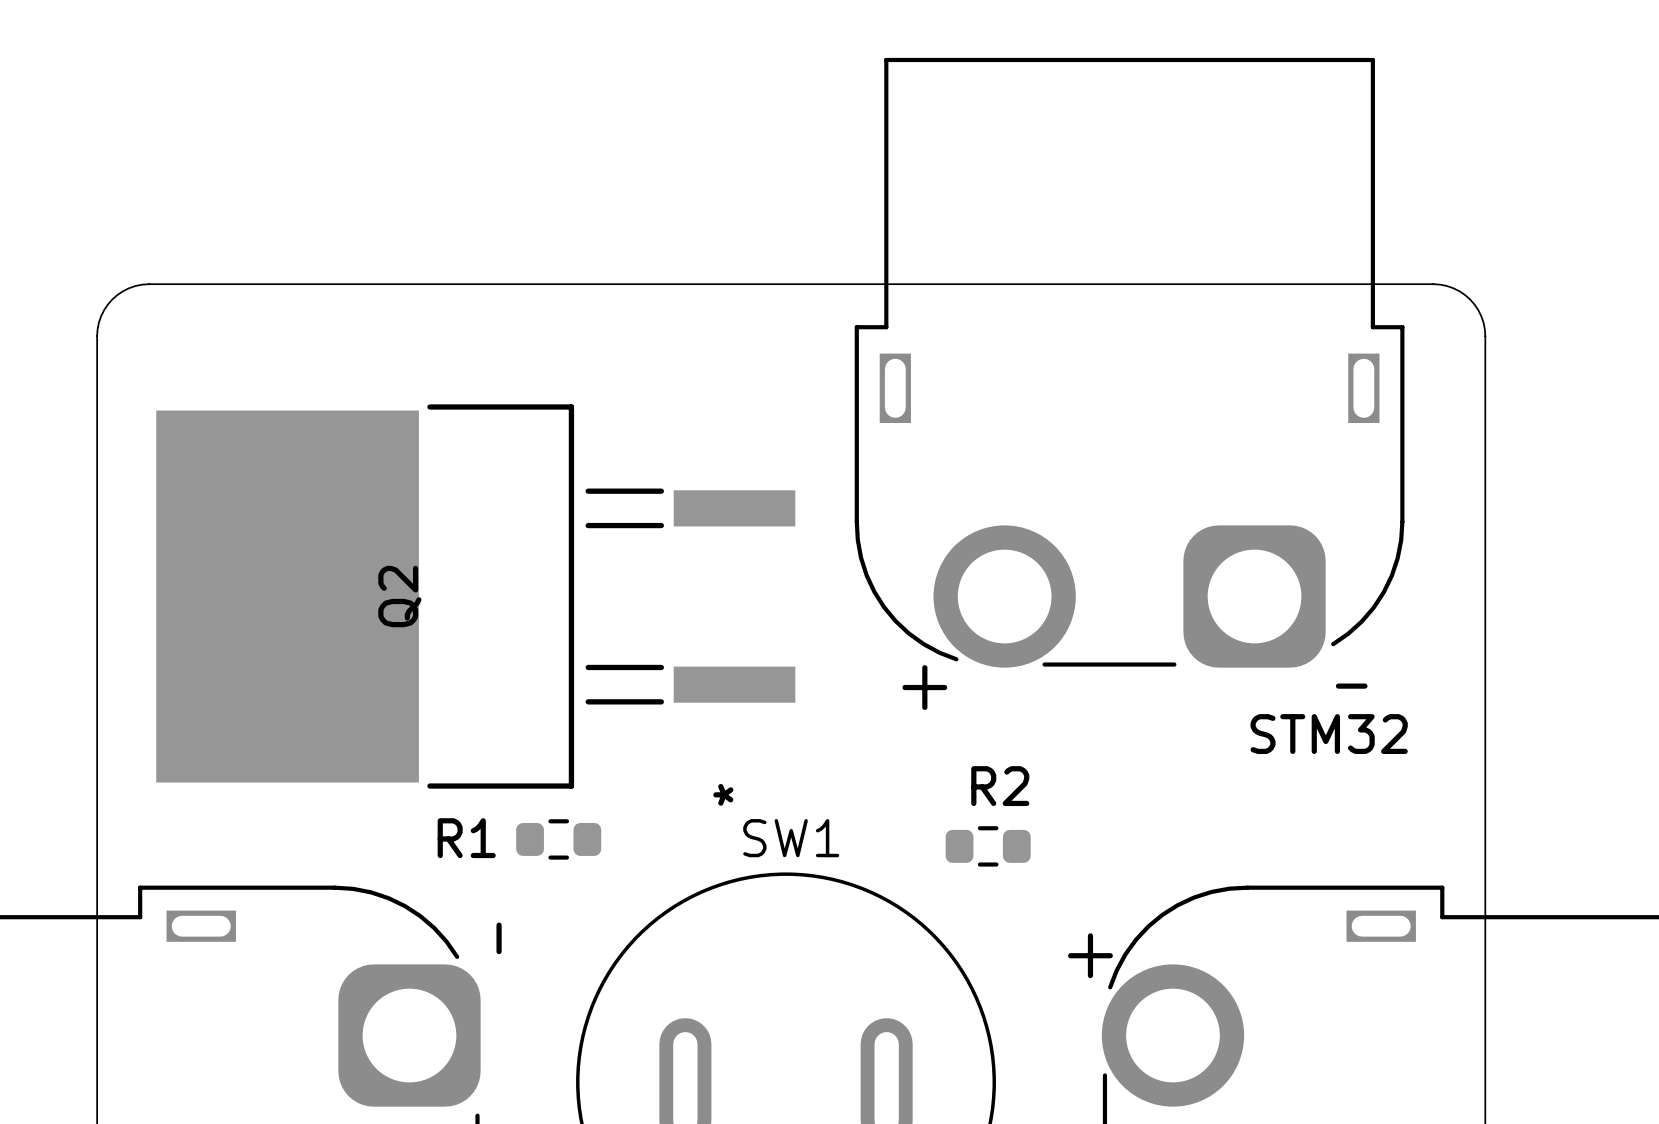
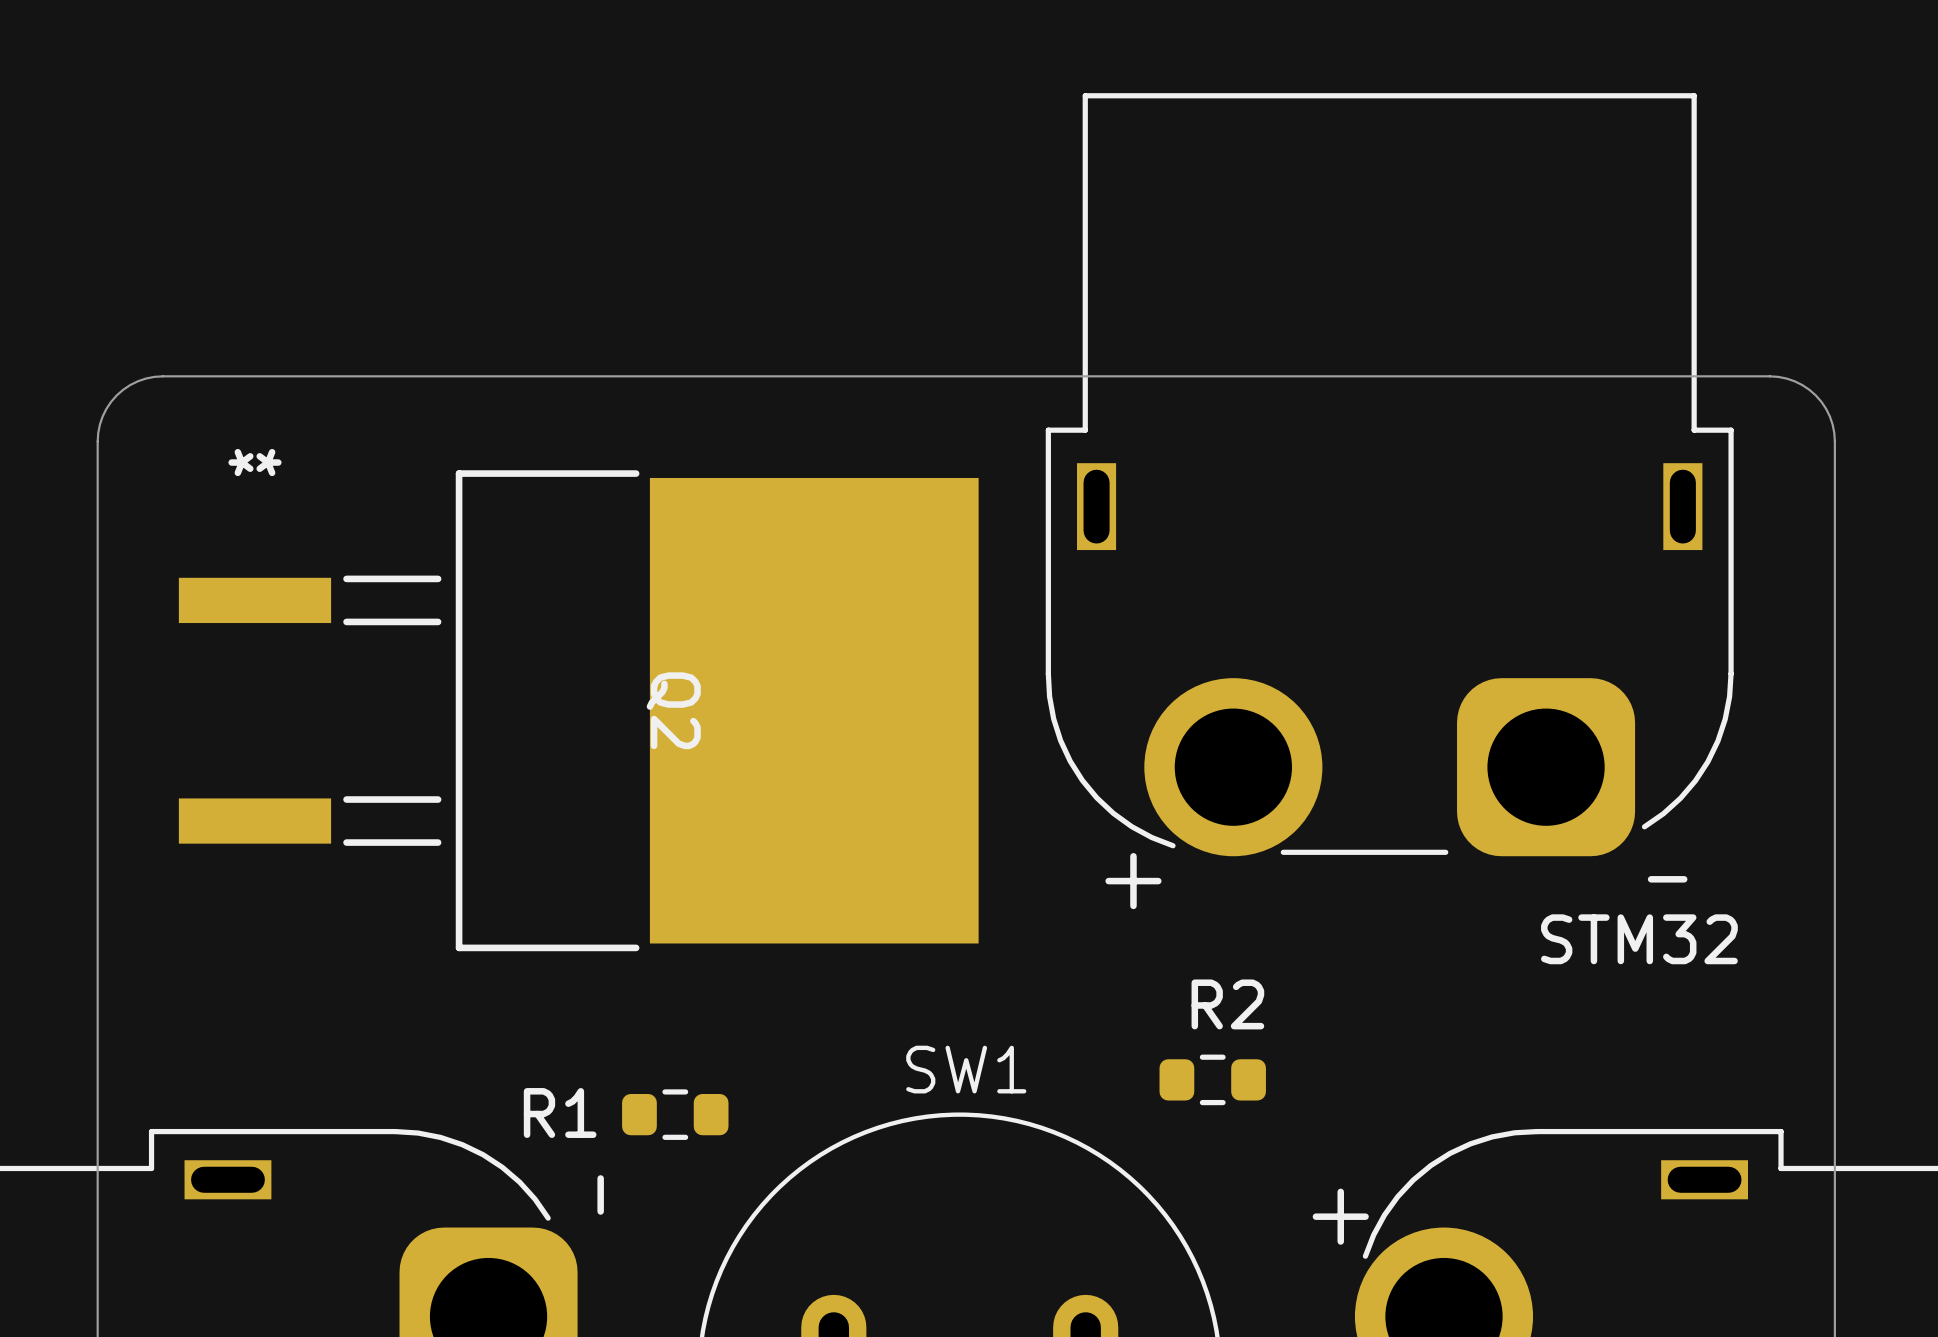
Q2 rotation: 0° (475, 596) -> 180° (578, 710)
R1 position: (558, 839) -> (675, 1114)

